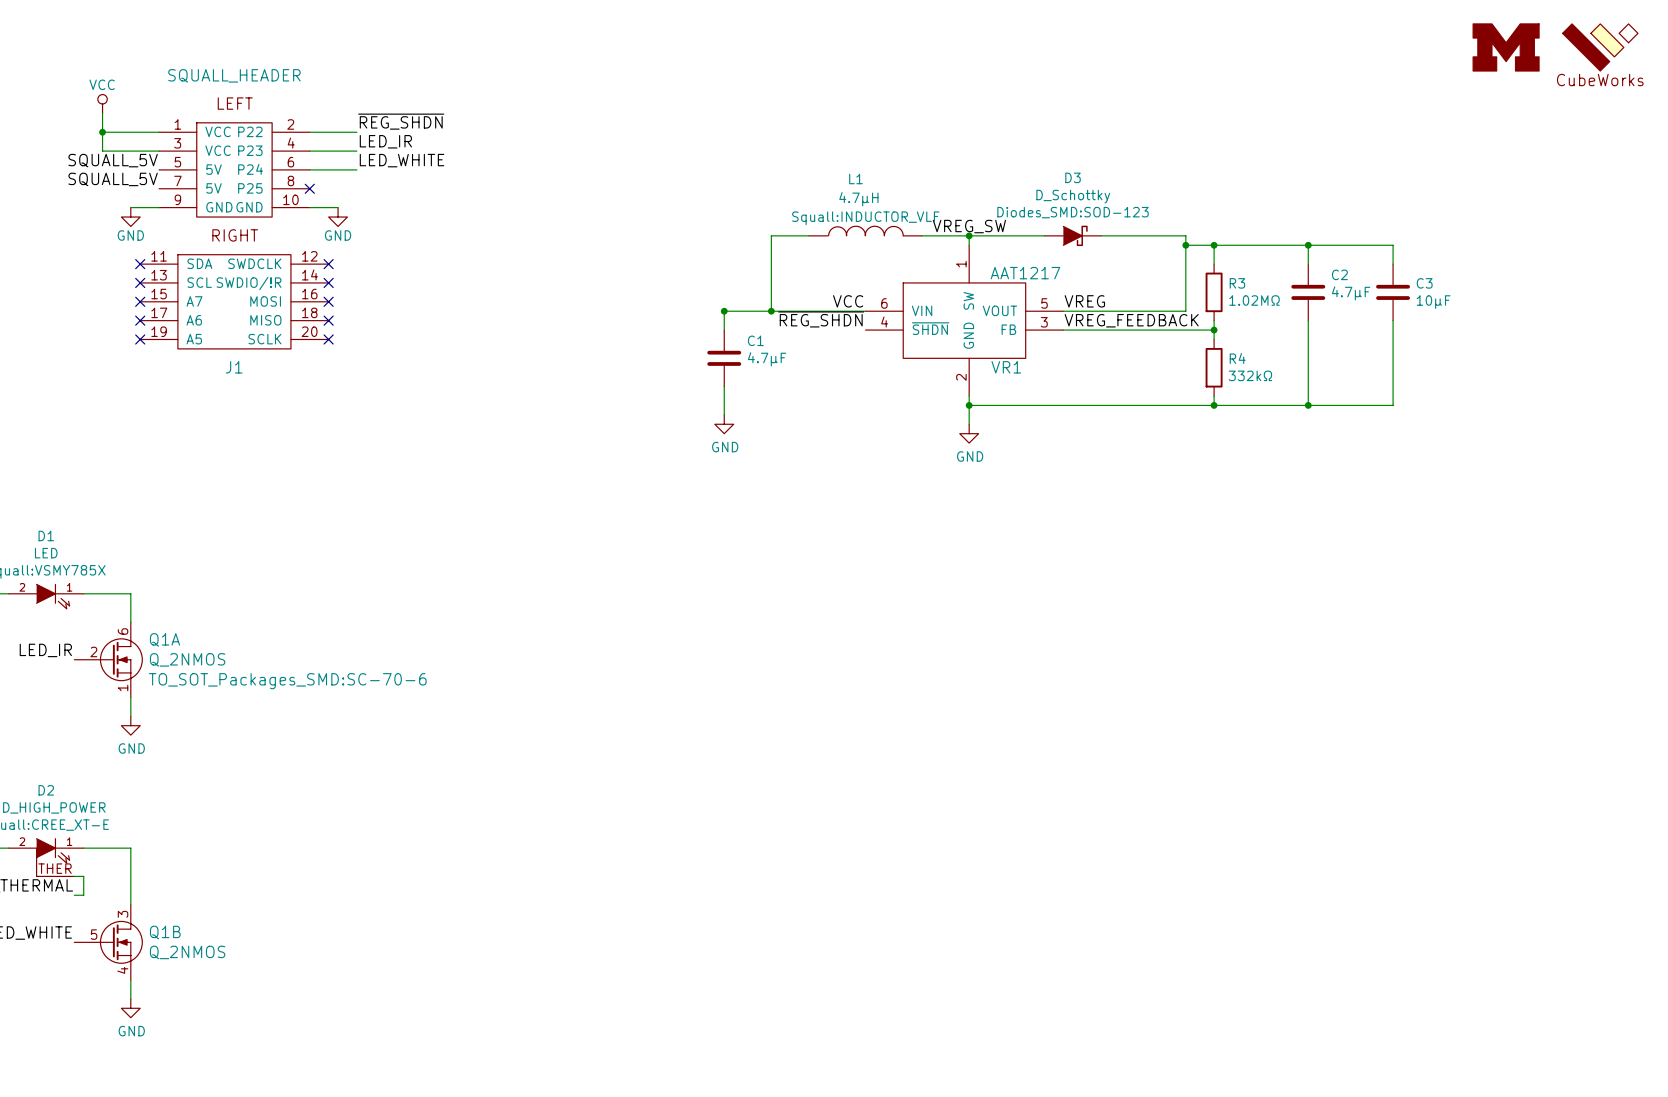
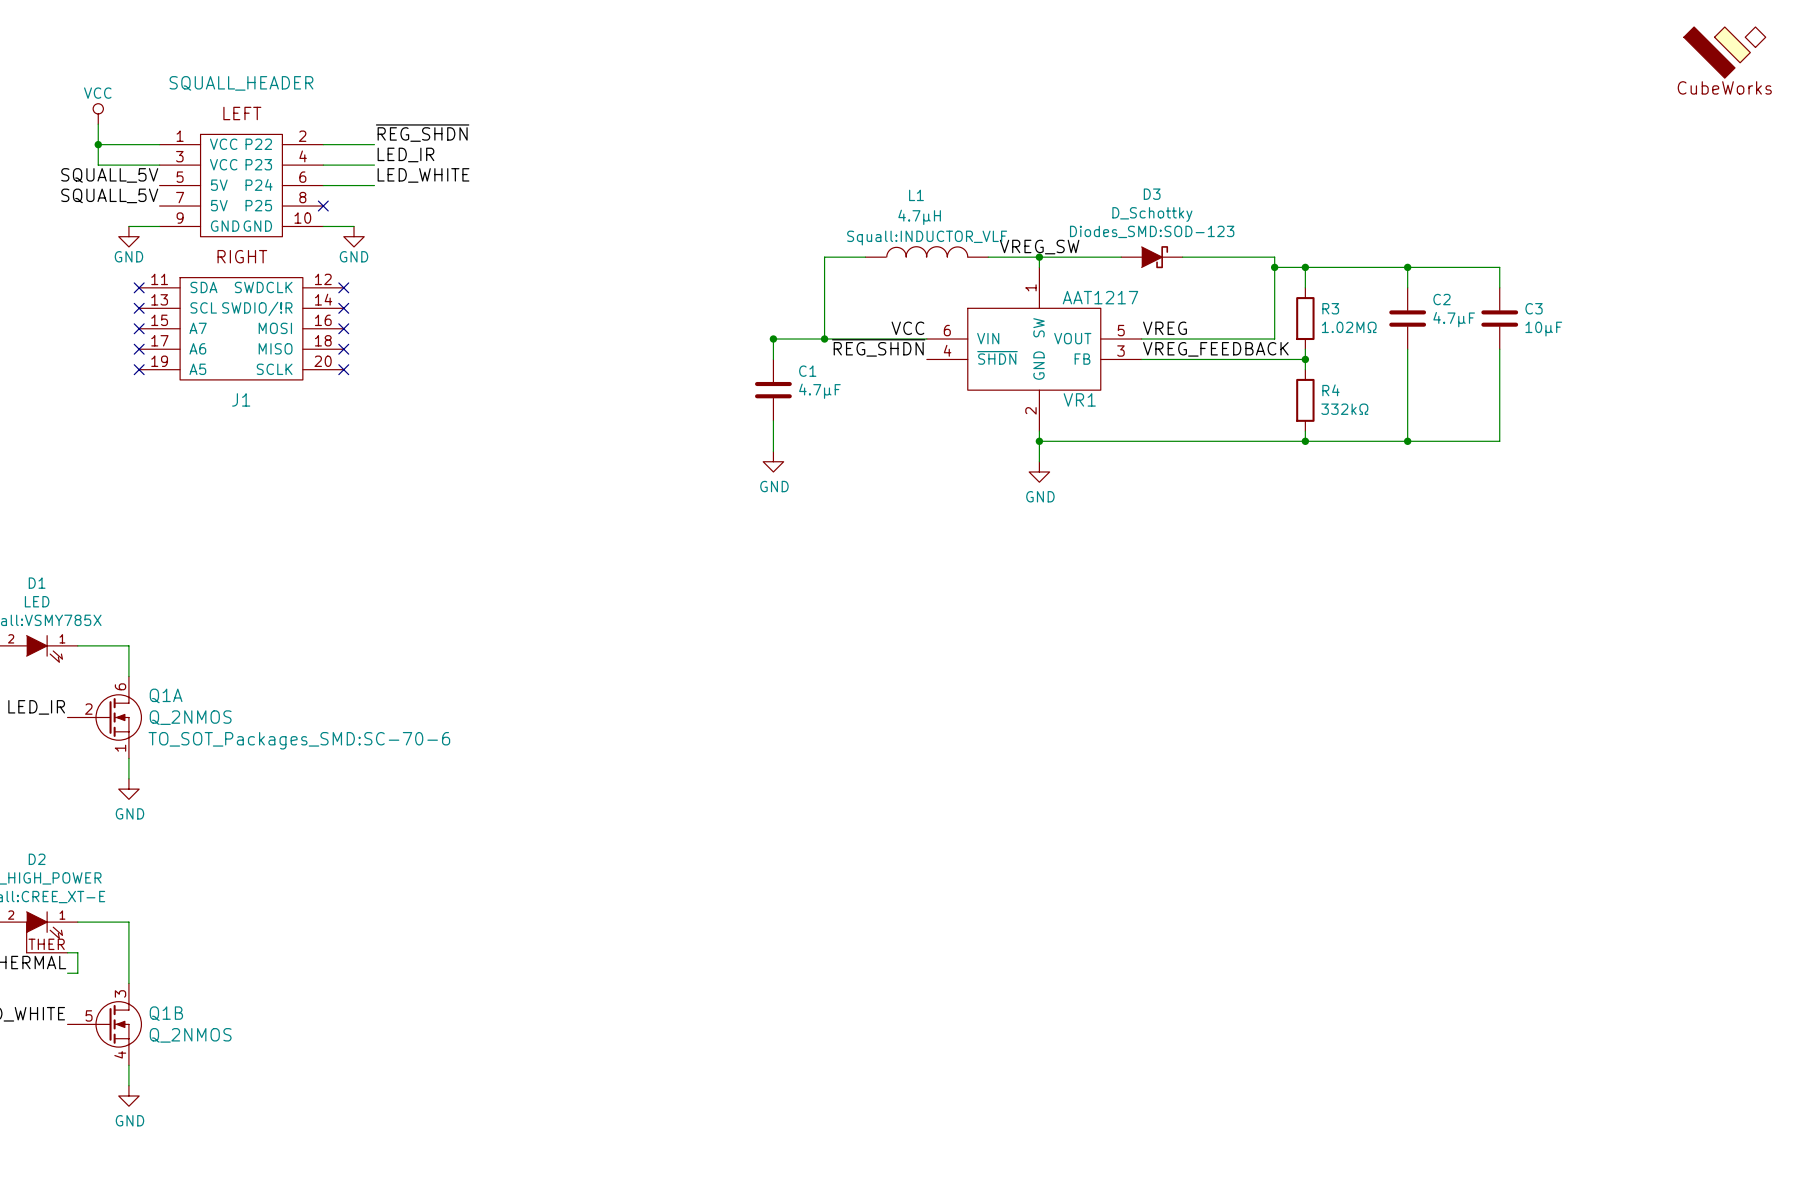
part: (1506, 47) -> none

